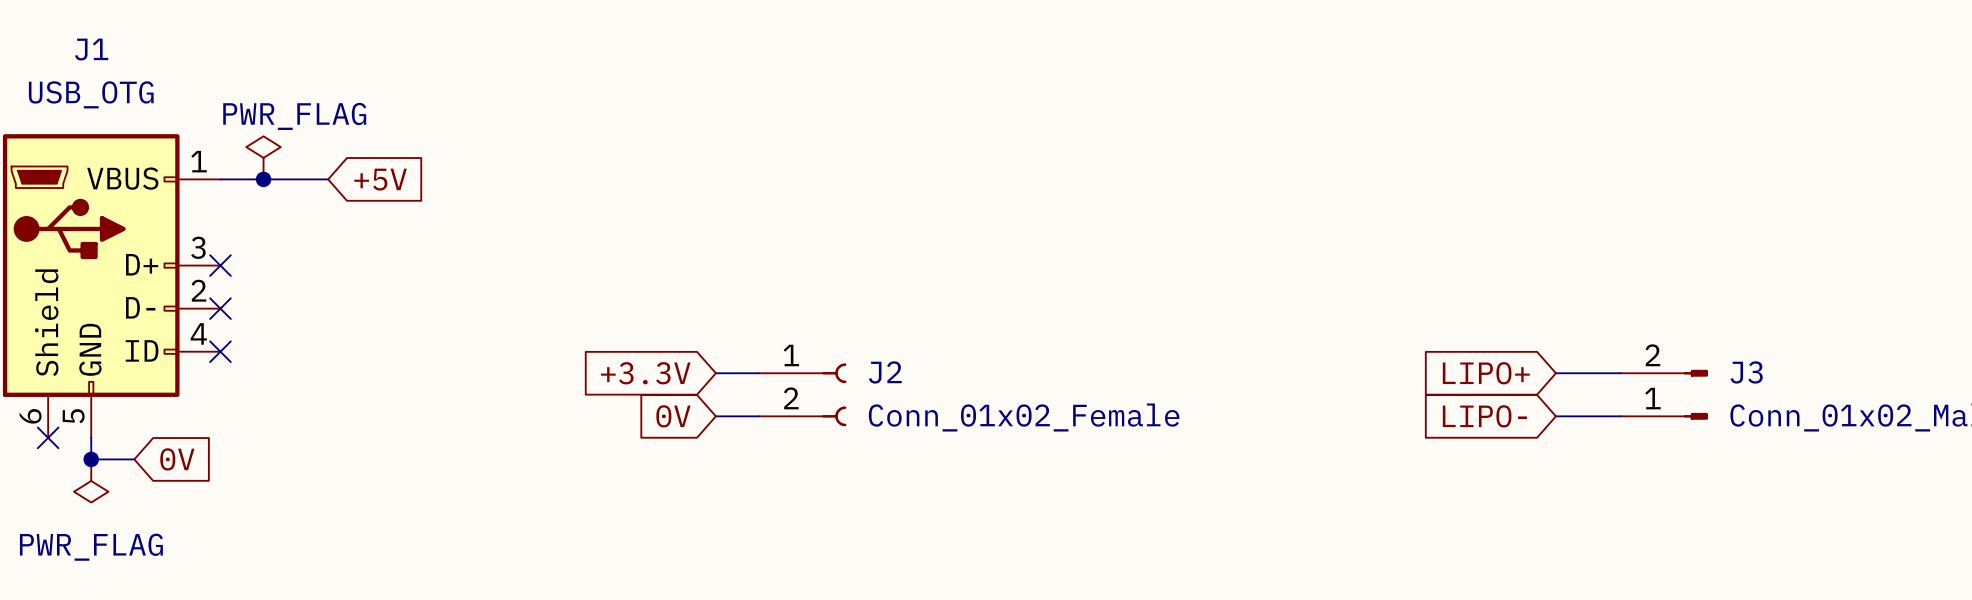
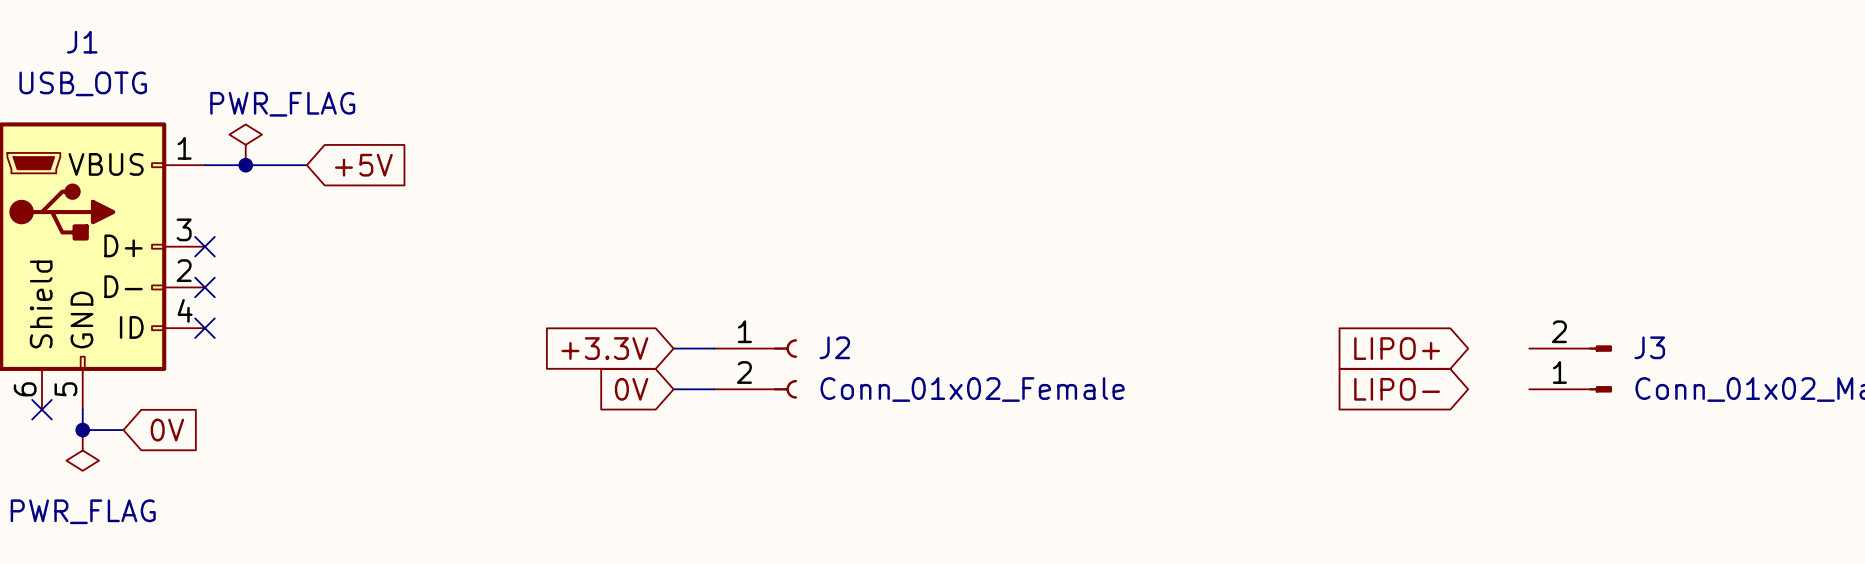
wire: (1555, 373) (1620, 373) -> none
wire: (1555, 416) (1620, 416) -> none

